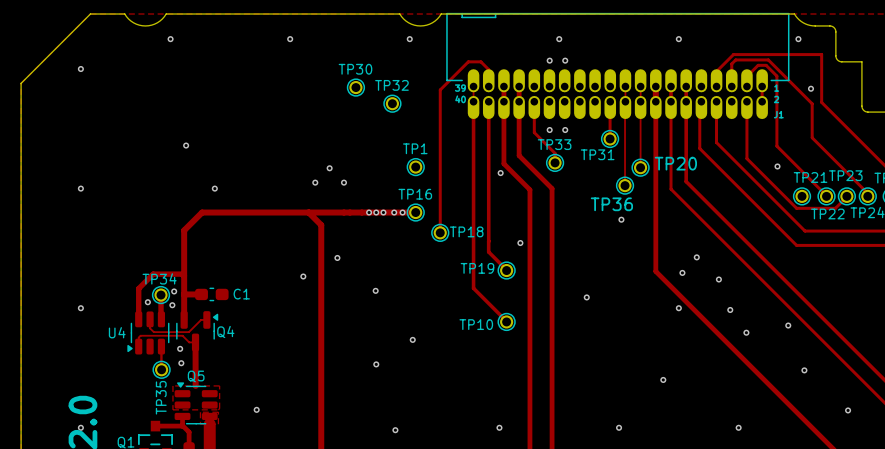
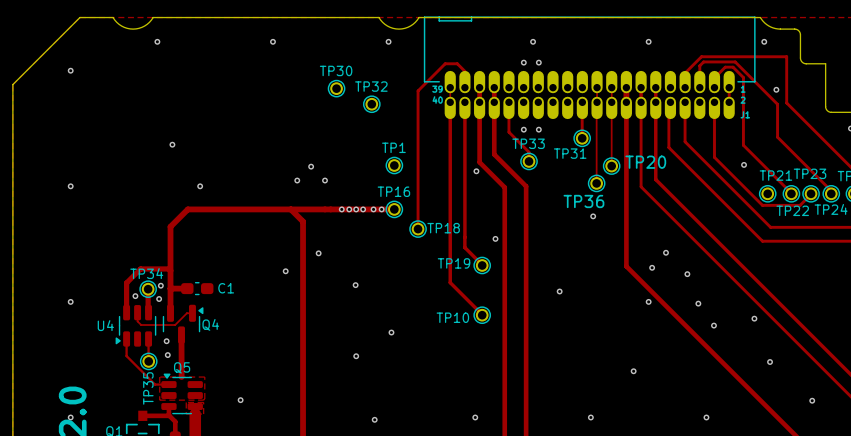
via: none -> (341, 209)
track: (195, 342) (189, 342) (182, 335) (140, 335) (138, 337) (138, 346) -> (168, 384) (155, 384) (126, 356) (126, 338)

